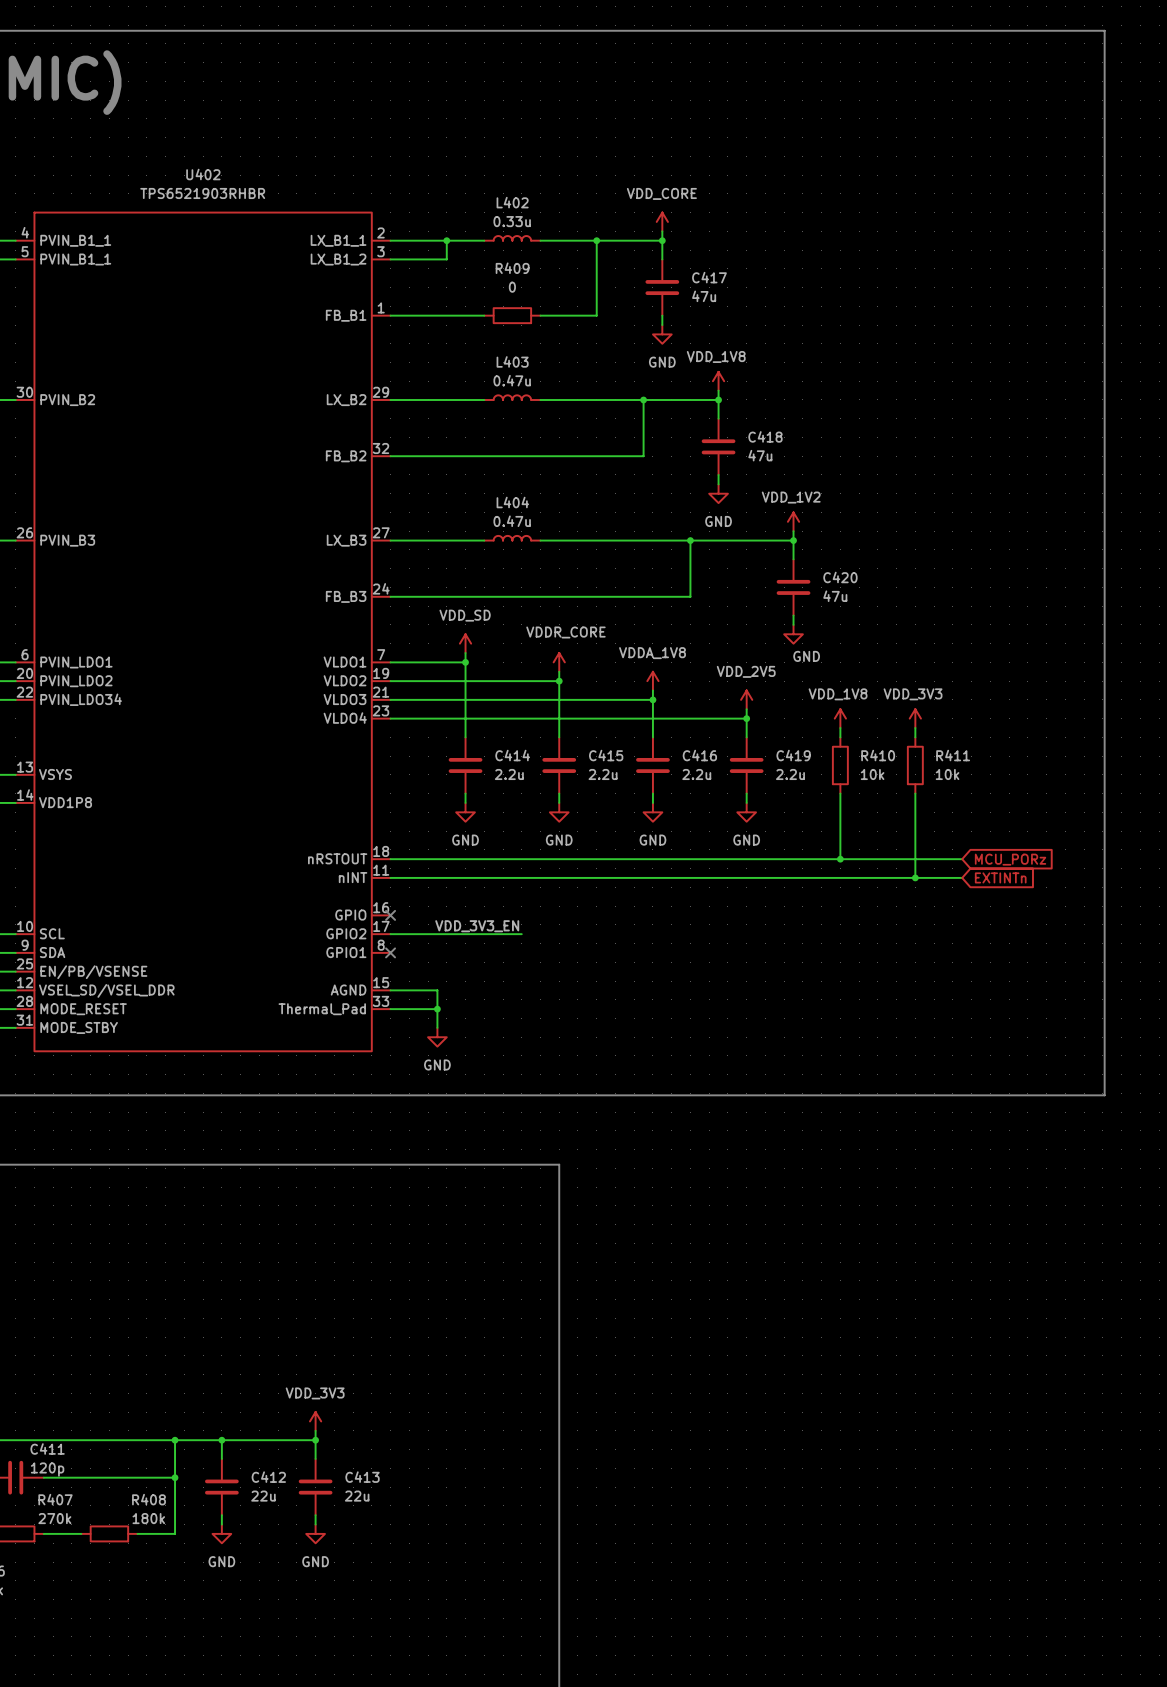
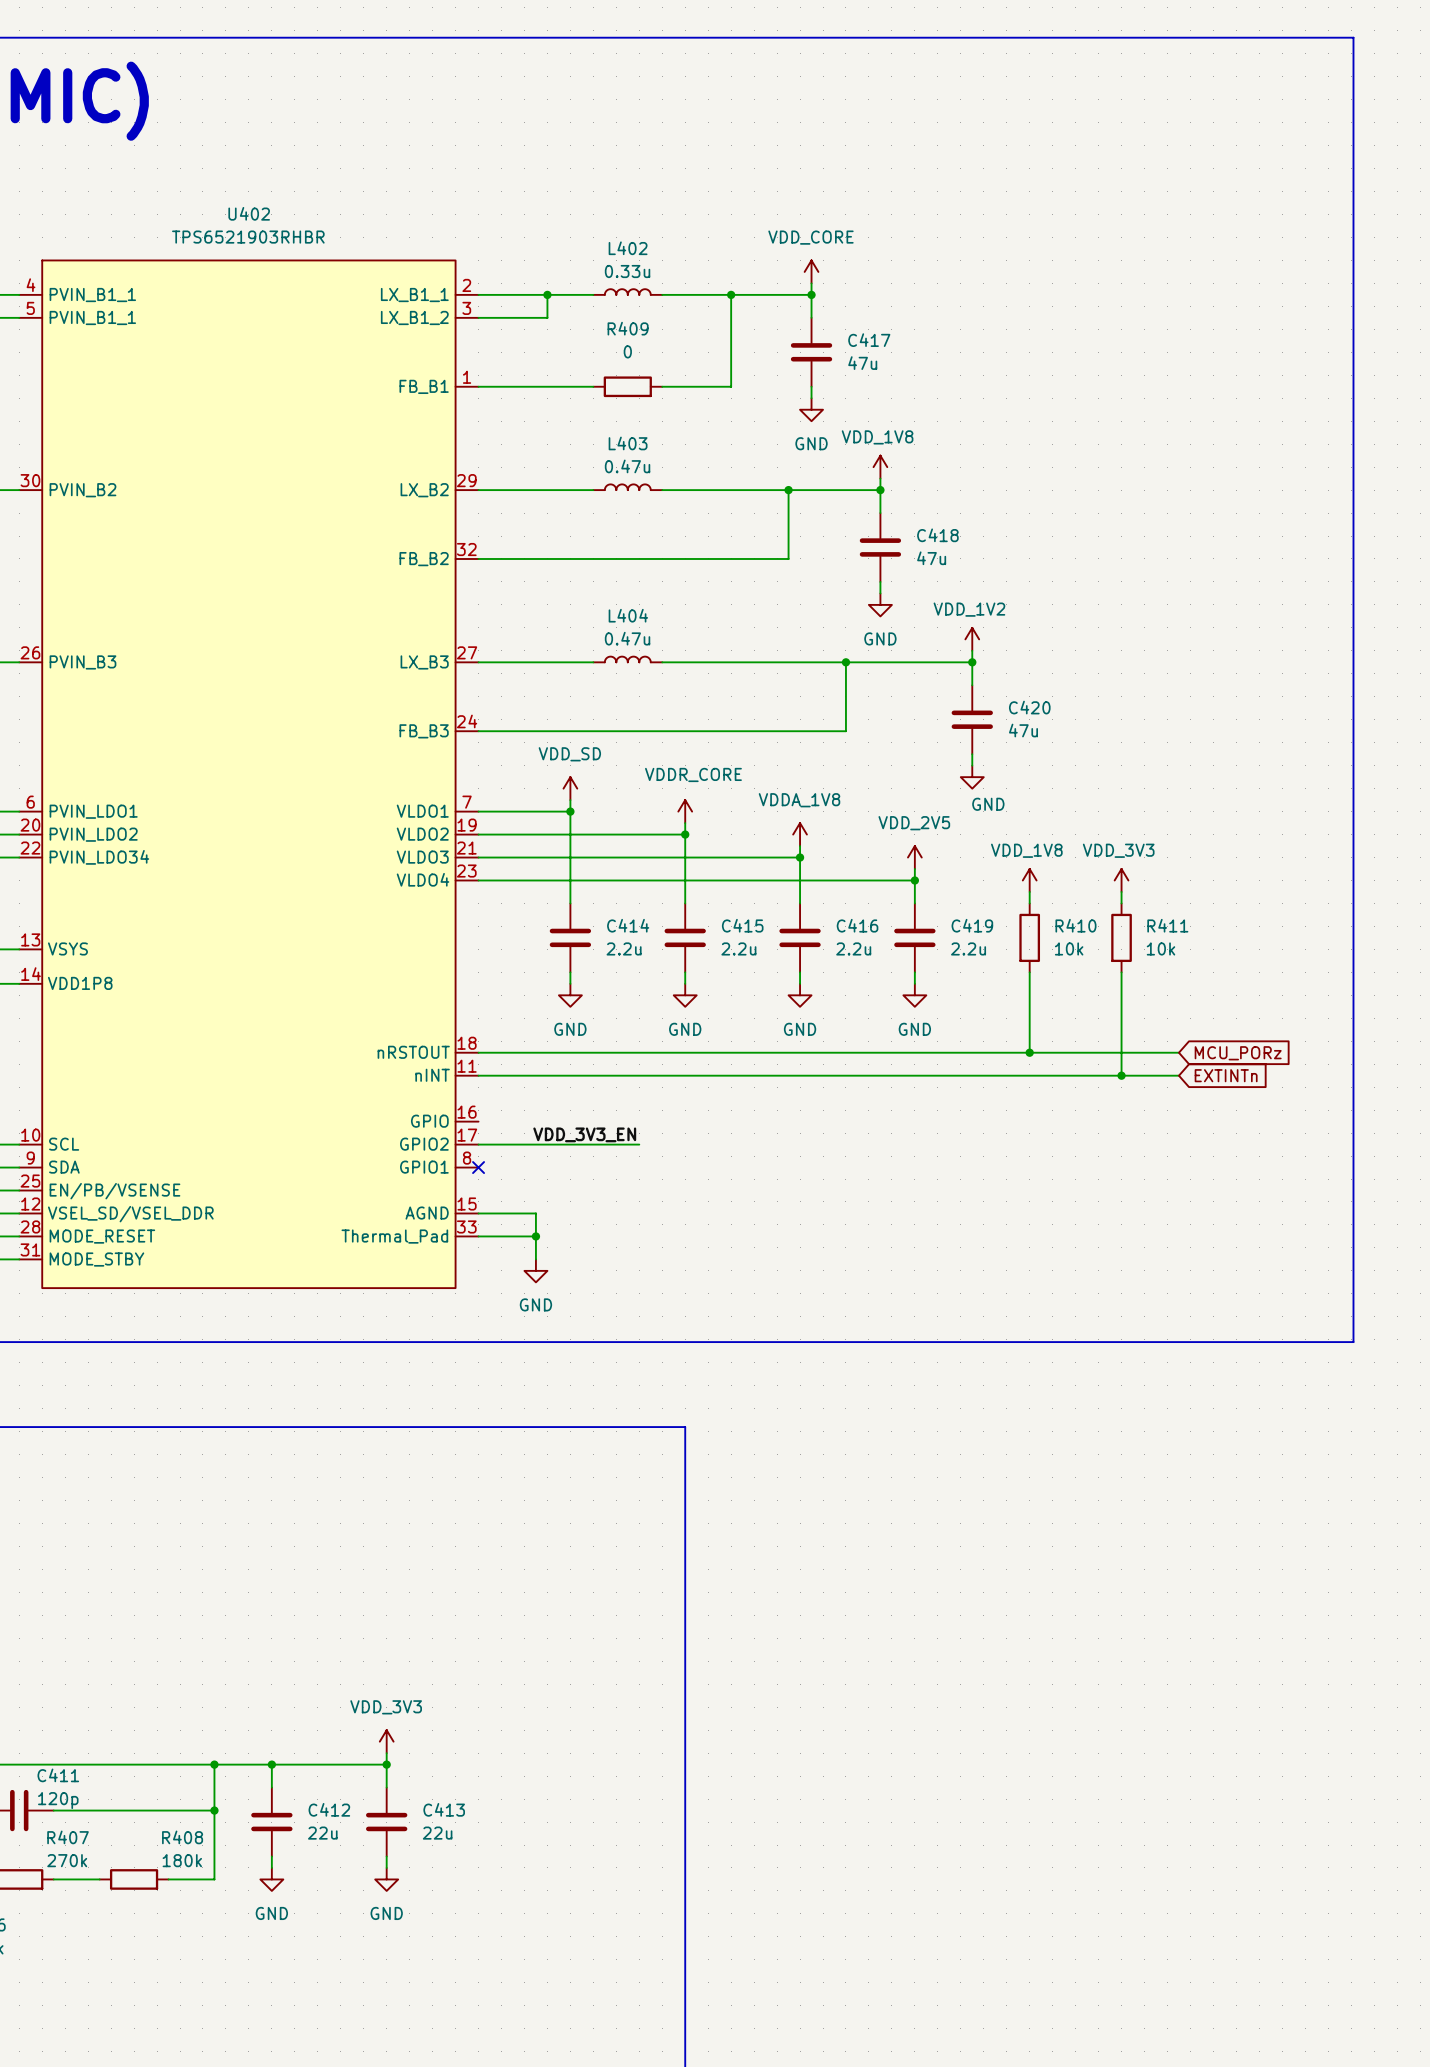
no-connect mark: (390, 915) -> none

